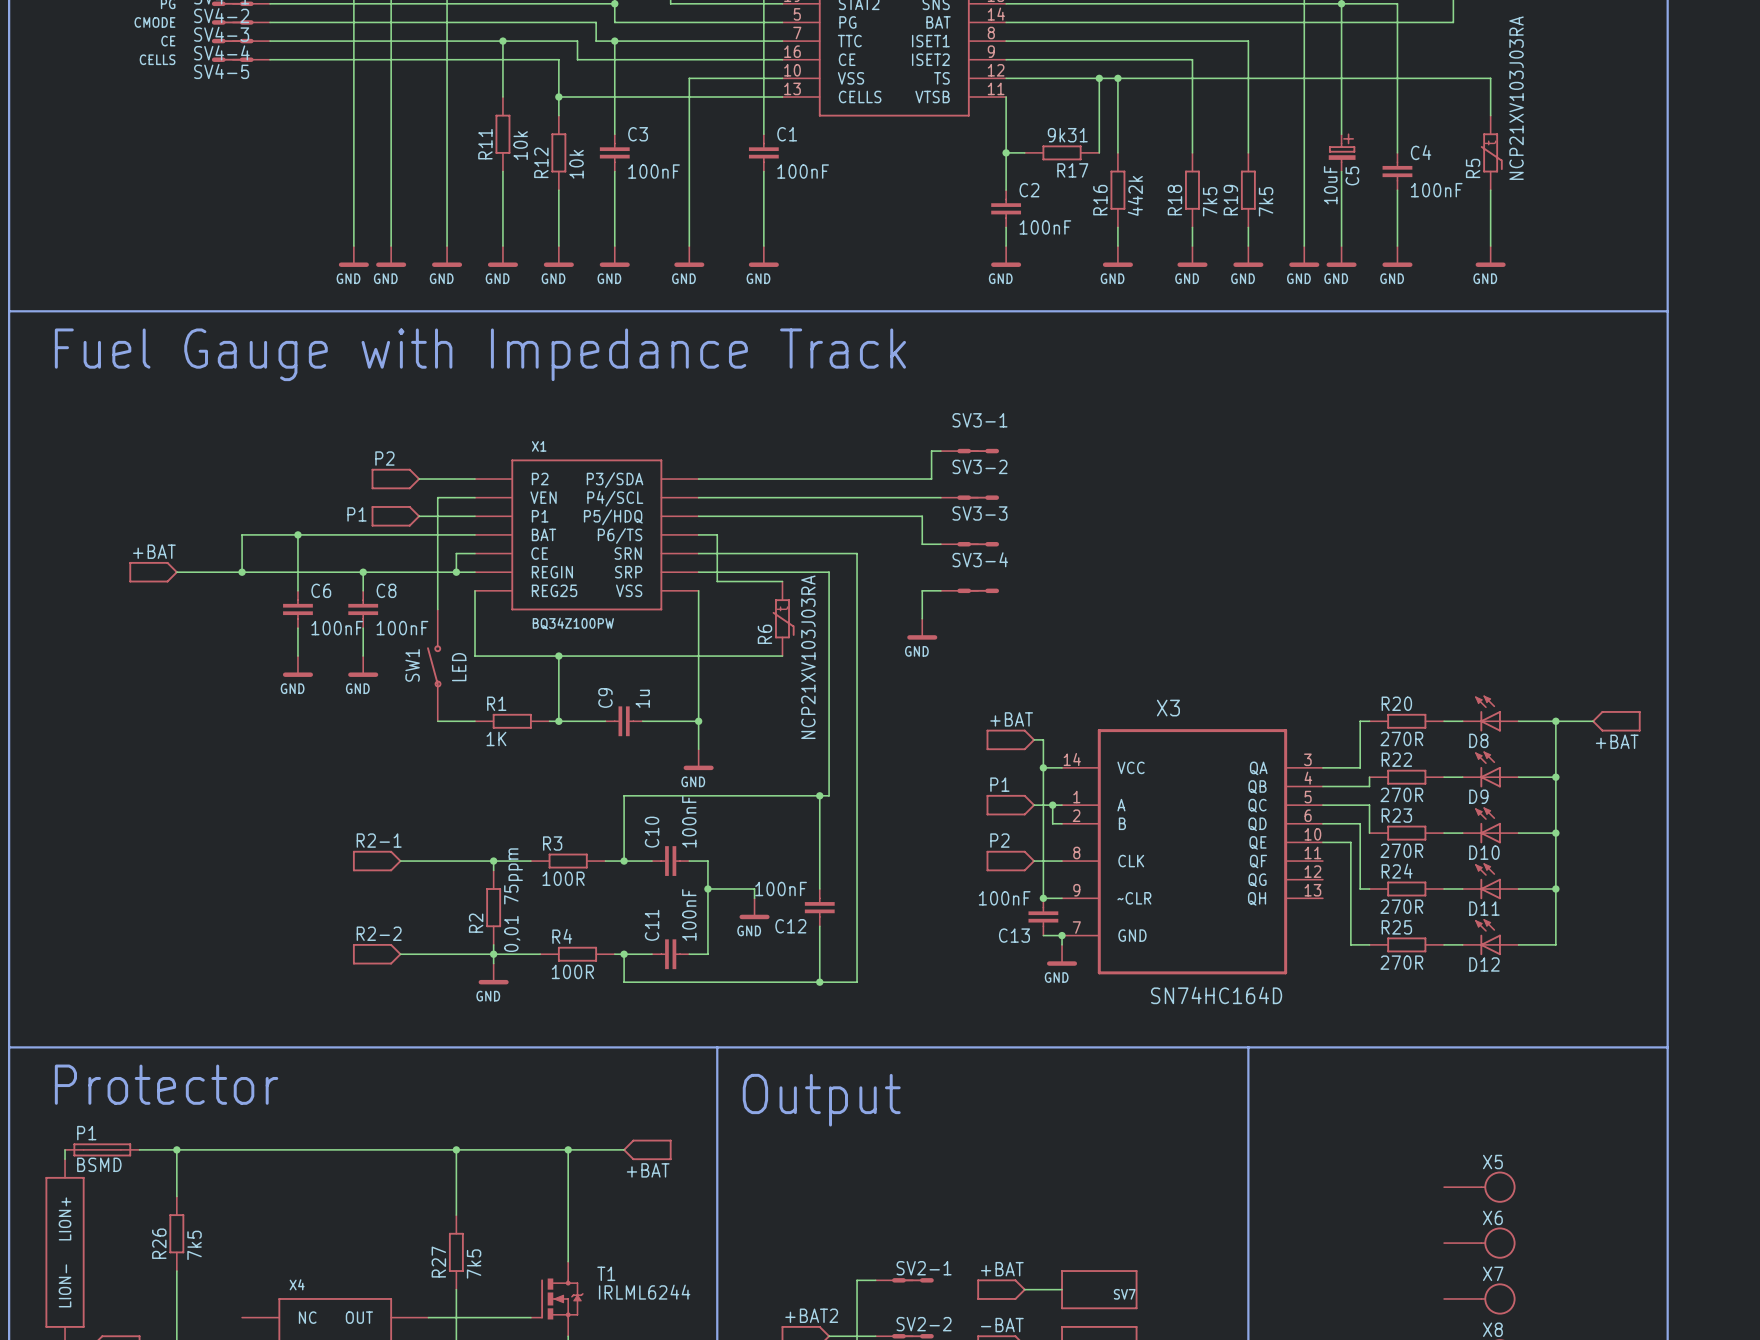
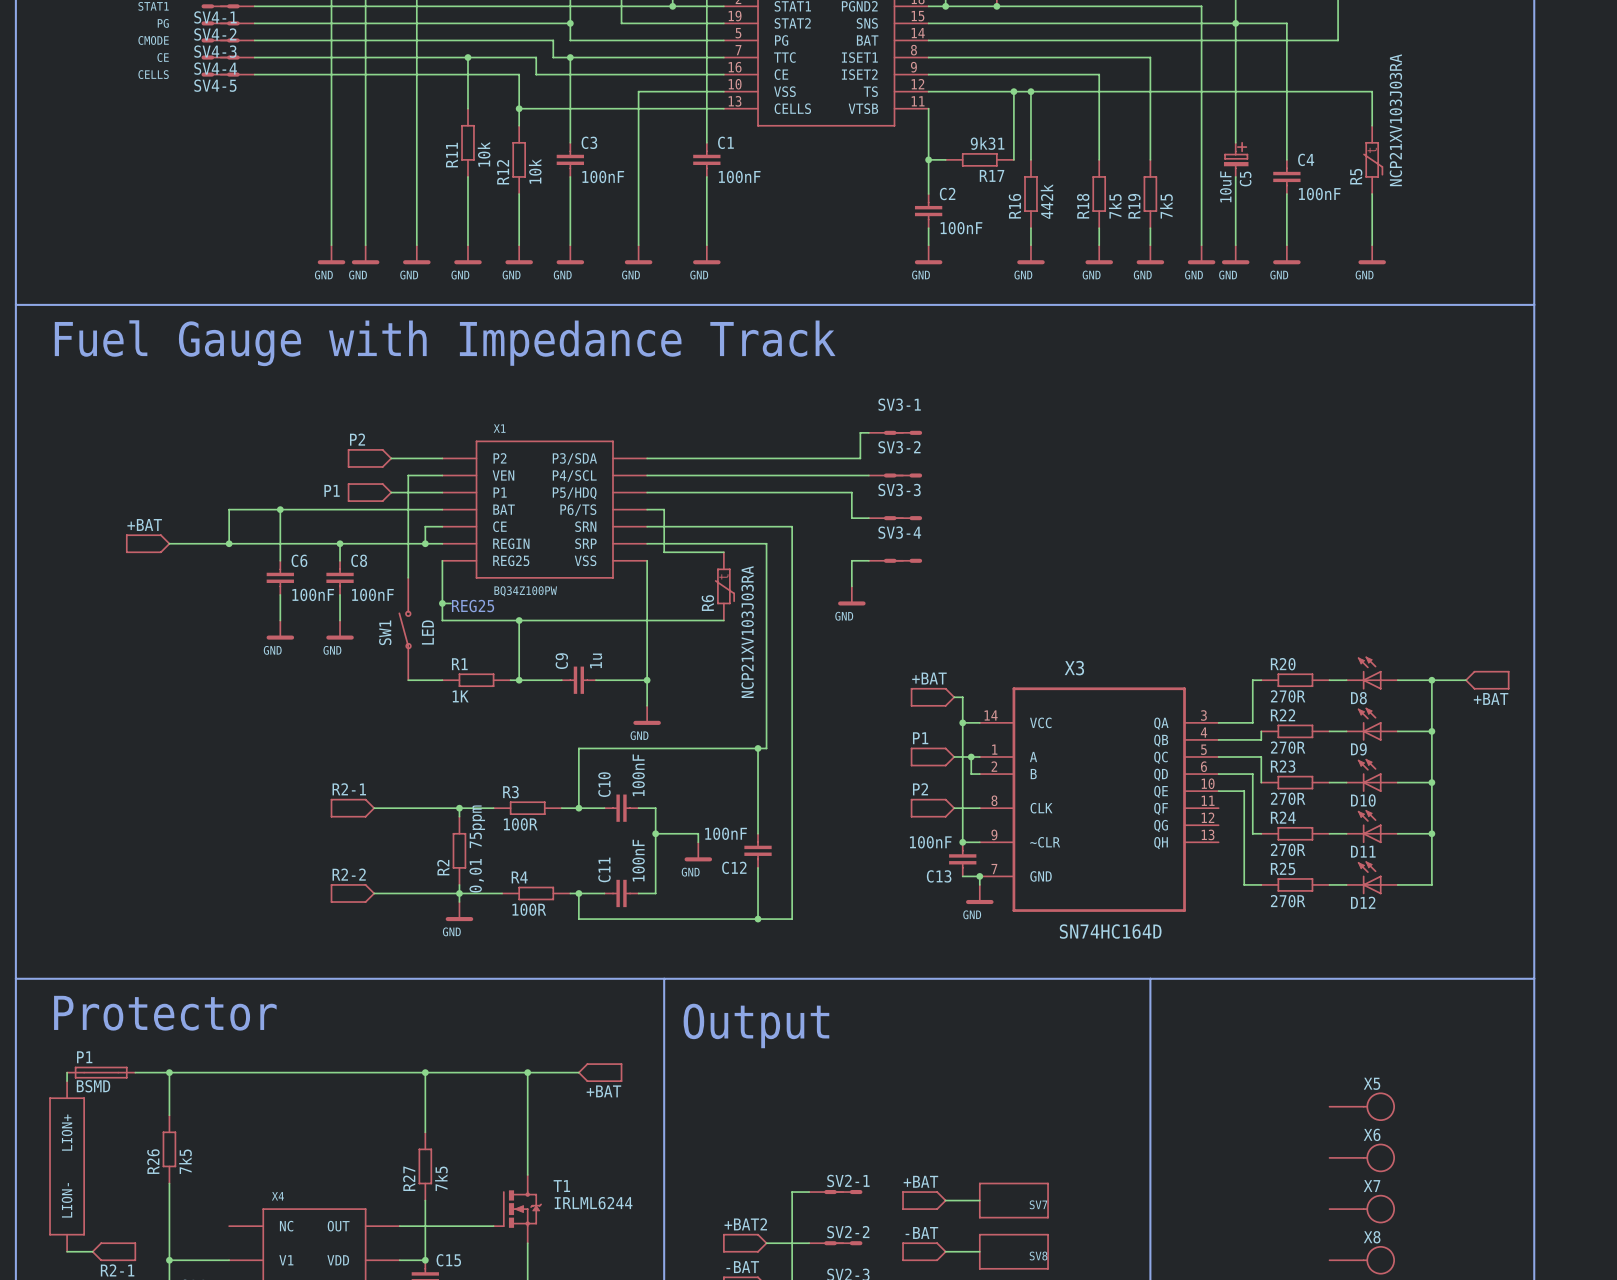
wire: none -> (442, 603) (450, 603)
junction: none -> (442, 603)
text: none -> REG25 (473, 606)

